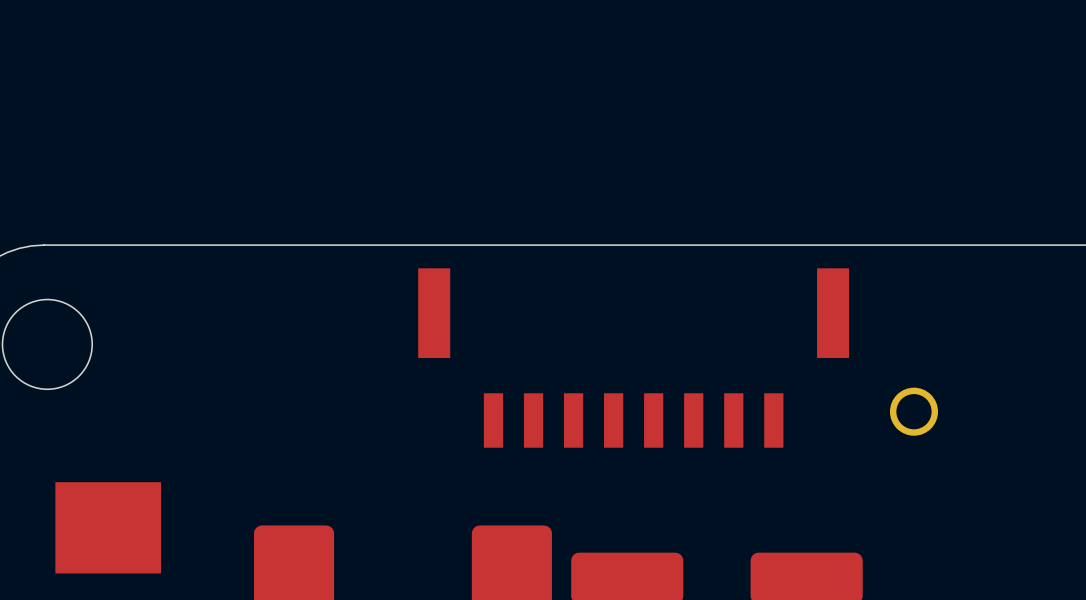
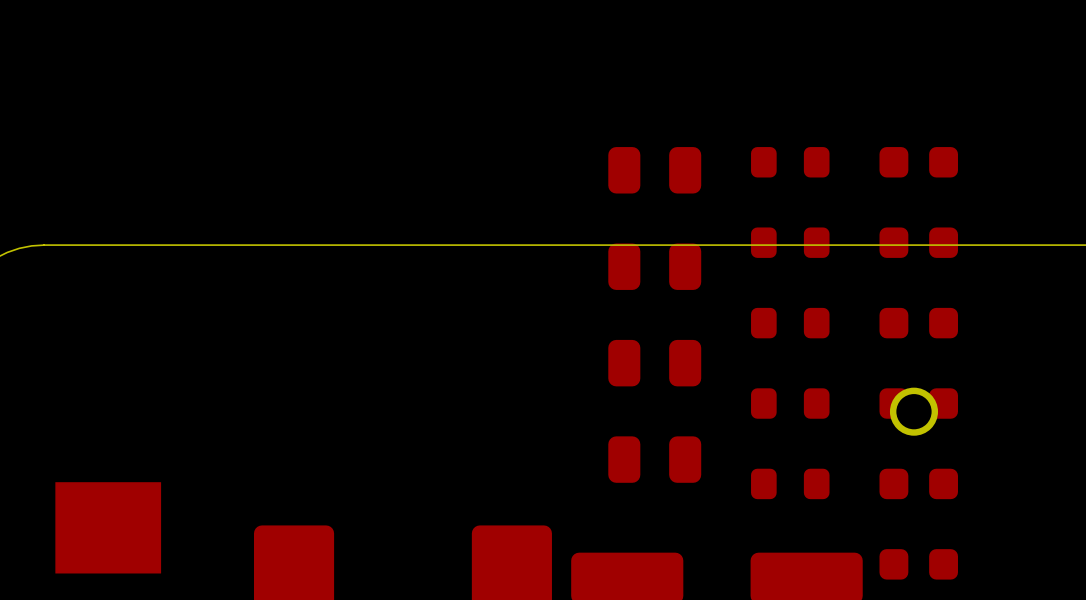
part: none -> (790, 162)
part: none -> (918, 162)
part: none -> (654, 170)
part: none -> (790, 242)
part: none -> (918, 242)
part: none -> (654, 266)
part footprint: [418, 268, 850, 448] -> [608, 339, 702, 387]
round board edge: [1, 298, 94, 391] -> none
part: none -> (790, 323)
part: none -> (918, 323)
part: none -> (790, 403)
part: none -> (918, 403)
part: none -> (654, 459)
part: none -> (790, 483)
part: none -> (918, 483)
part: none -> (918, 564)

